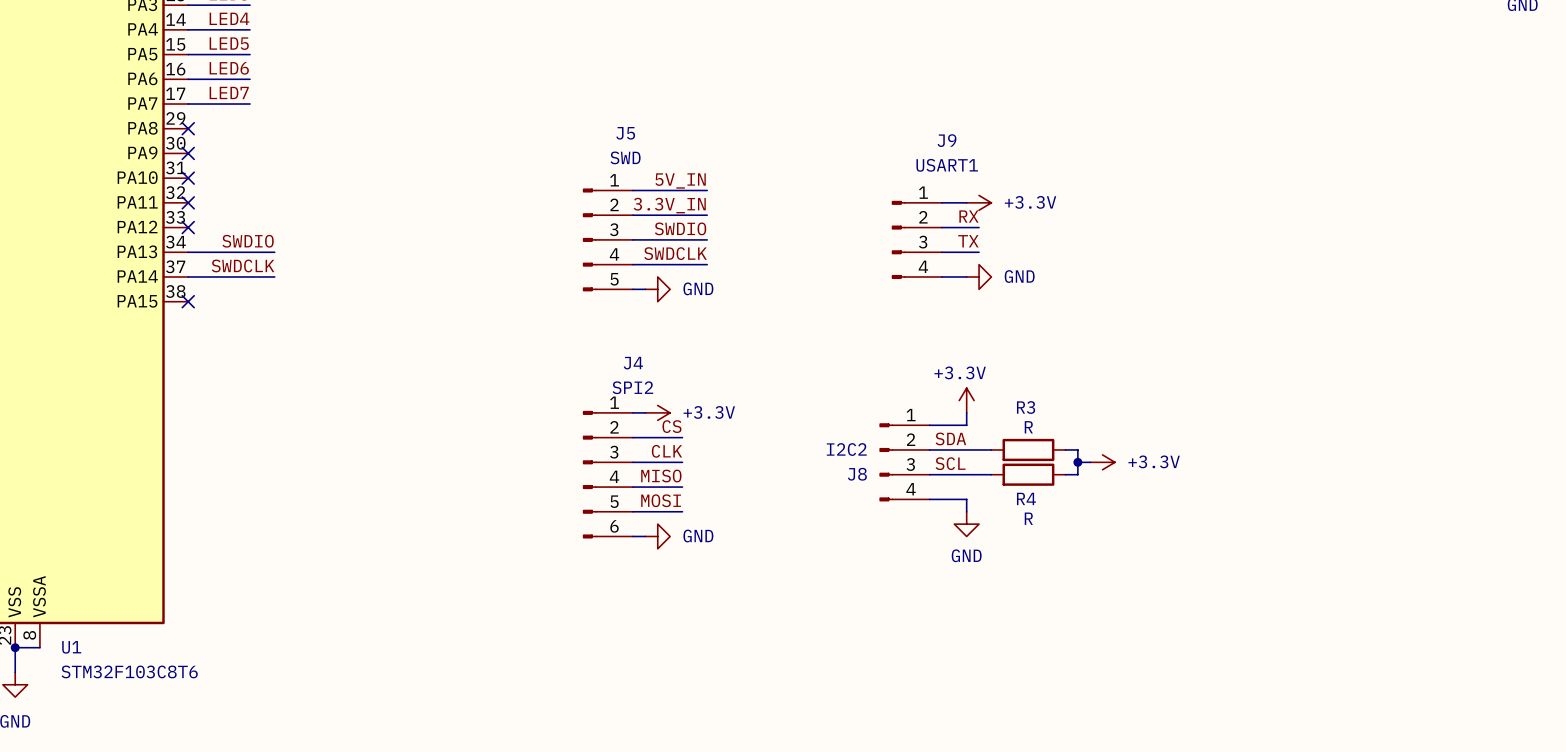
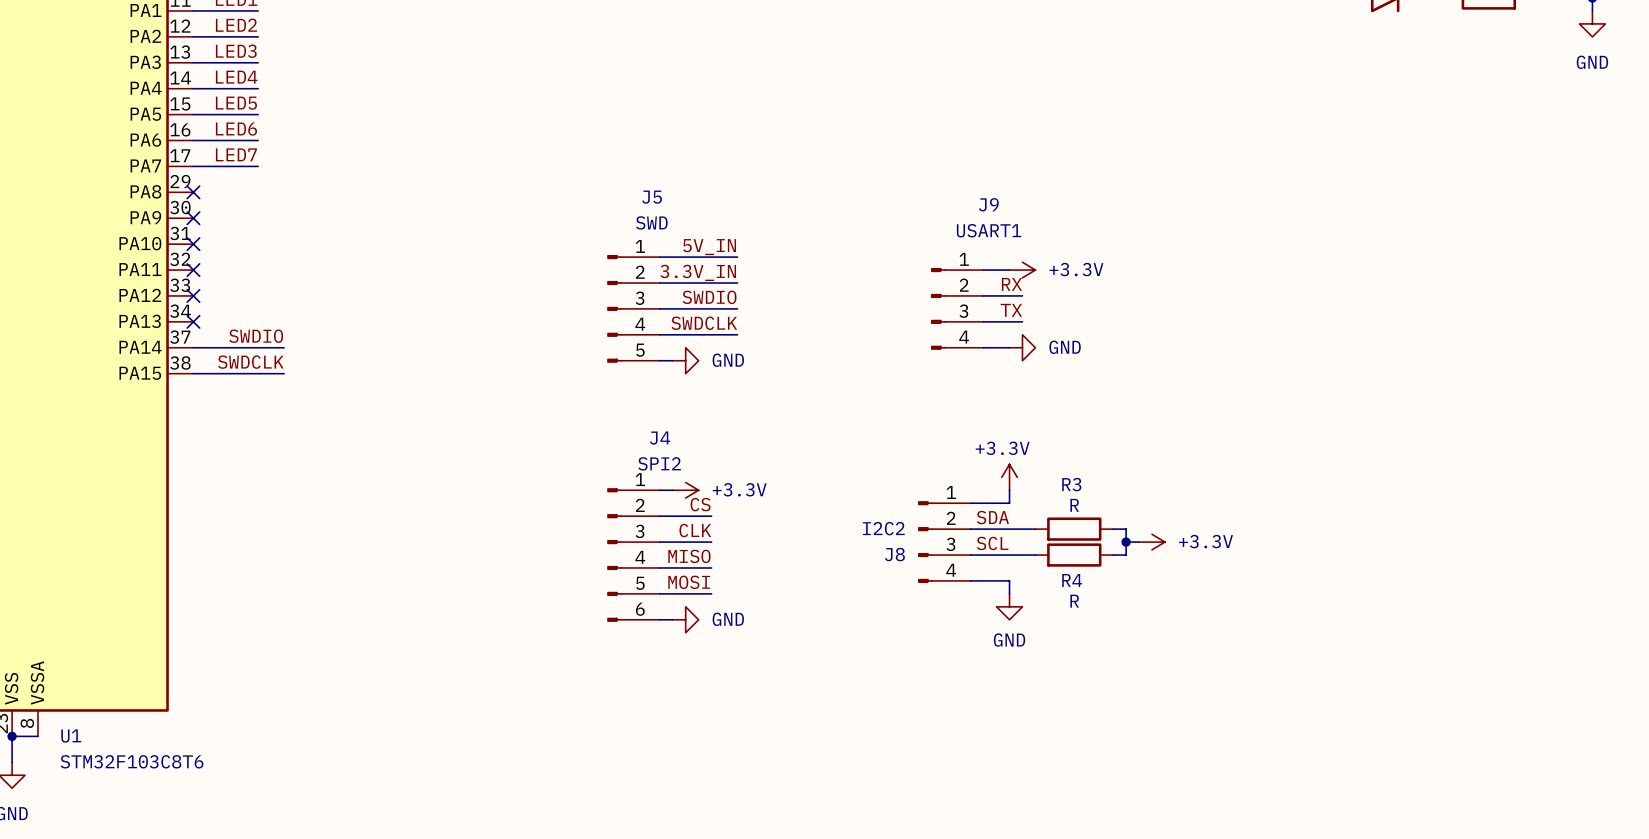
label: SWDIO (248, 241) -> none
wire: (188, 252) (274, 252) -> (193, 373) (284, 373)
label: SWDCLK (243, 265) -> SWDIO (256, 336)
label: none -> SWDCLK (250, 362)
no-connect mark position: (188, 301) -> (193, 321)

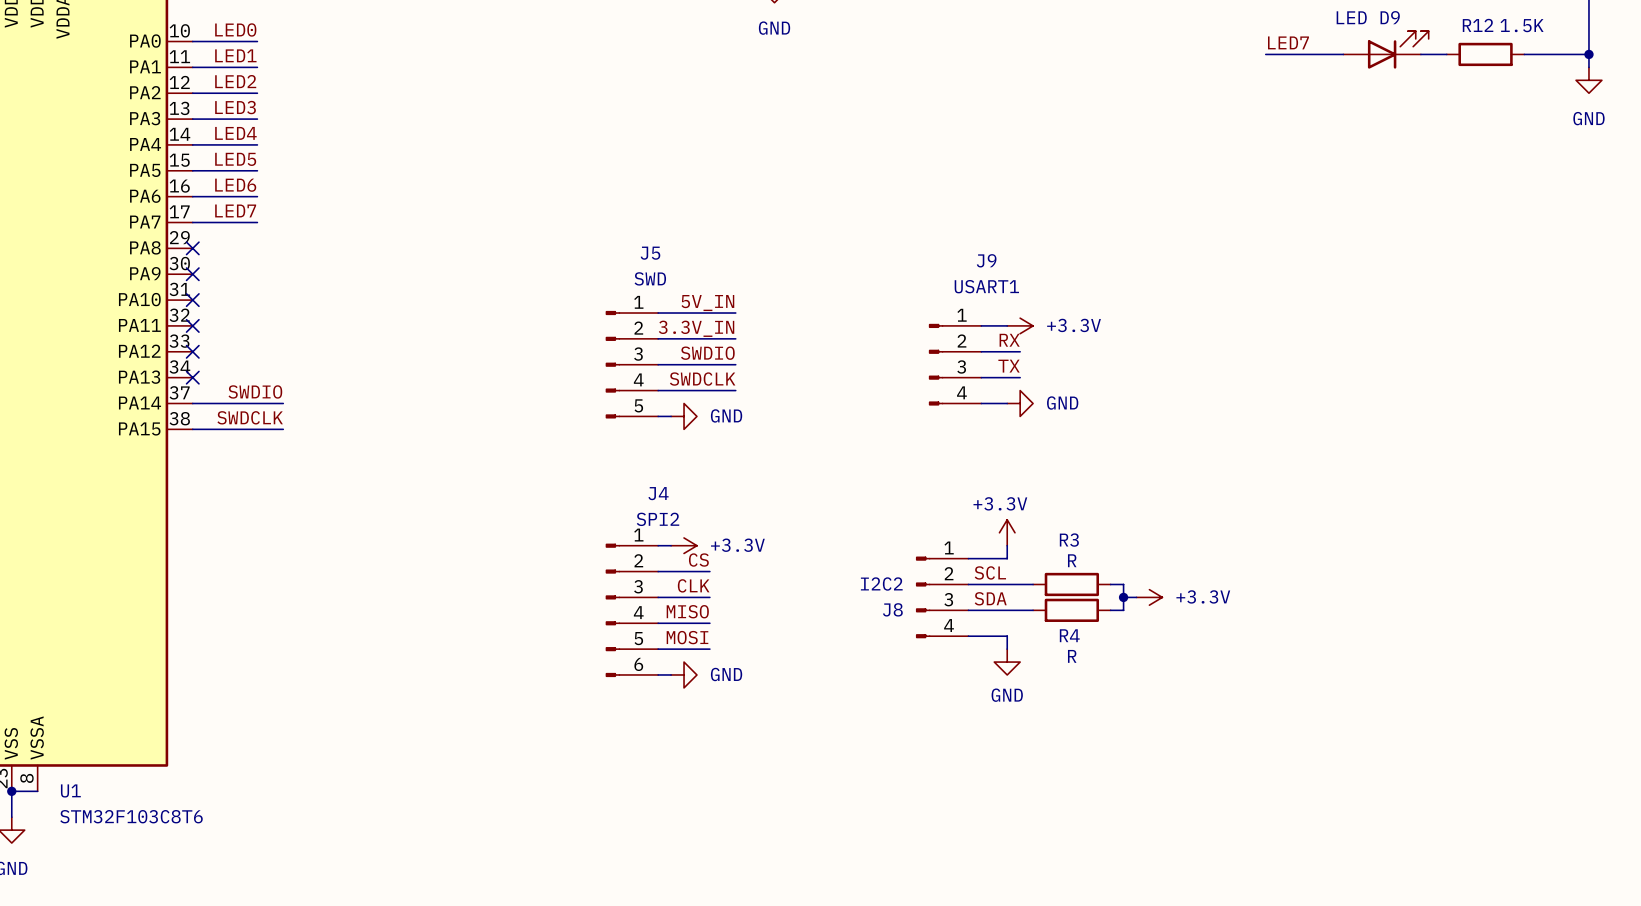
label: SDA (992, 517) -> SCL (990, 572)
label: SCL (992, 543) -> SDA (990, 598)

